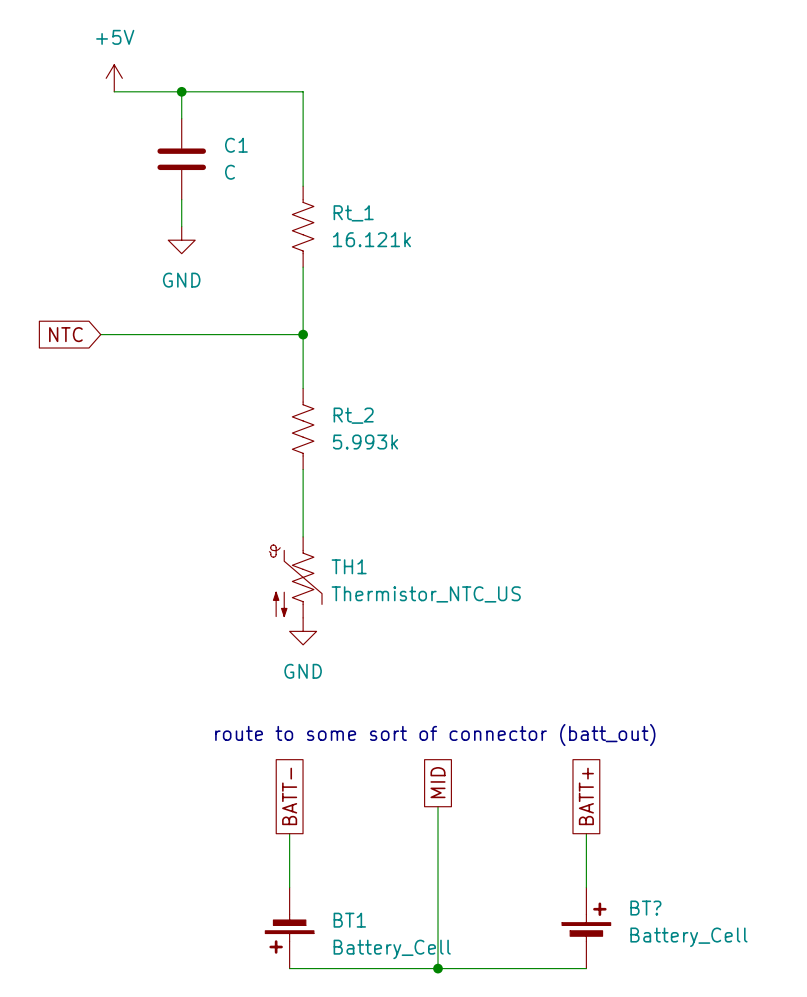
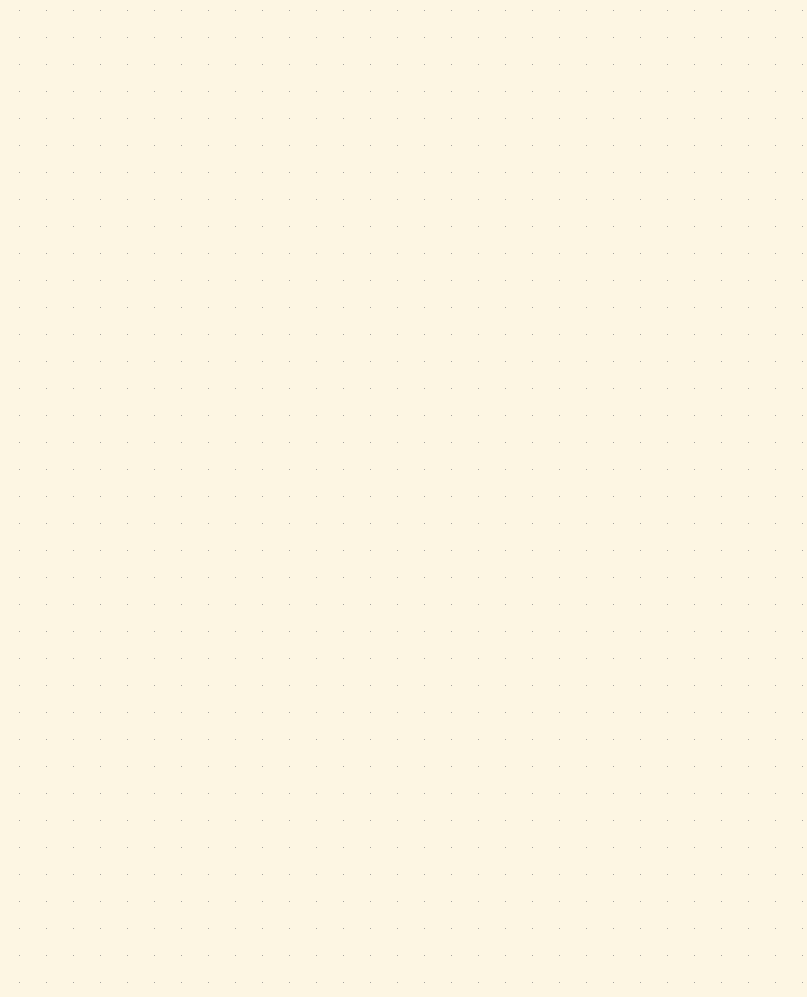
power symbol: +5V (114, 78) -> none
wire: (114, 91) (303, 91) (303, 186) -> none
wire: (181, 91) (181, 118) -> none
junction: (181, 91) -> none
C1: C (181, 159) -> none
wire: (181, 199) (181, 226) -> none
Rt_1: 16.121k (303, 226) -> none
power symbol: GND (181, 240) -> none
wire: (303, 267) (303, 388) -> none
global label: NTC (65, 334) -> none
wire: (100, 334) (303, 334) -> none
junction: (303, 334) -> none
Rt_2: 5.993k (303, 429) -> none
wire: (303, 469) (303, 536) -> none
TH1: Thermistor_NTC_US (295, 577) -> none
power symbol: GND (303, 631) -> none
text: route to some sort of connector (batt_out) (435, 735) -> none
global label: MID (438, 782) -> none
global label: BATT- (289, 796) -> none
global label: BATT+ (586, 796) -> none
wire: (438, 806) (438, 968) -> none
wire: (289, 833) (289, 887) -> none
wire: (586, 833) (586, 887) -> none
BT1: Battery_Cell (289, 928) -> none
BT?: Battery_Cell (586, 928) -> none
wire: (289, 968) (586, 968) -> none
junction: (438, 968) -> none

